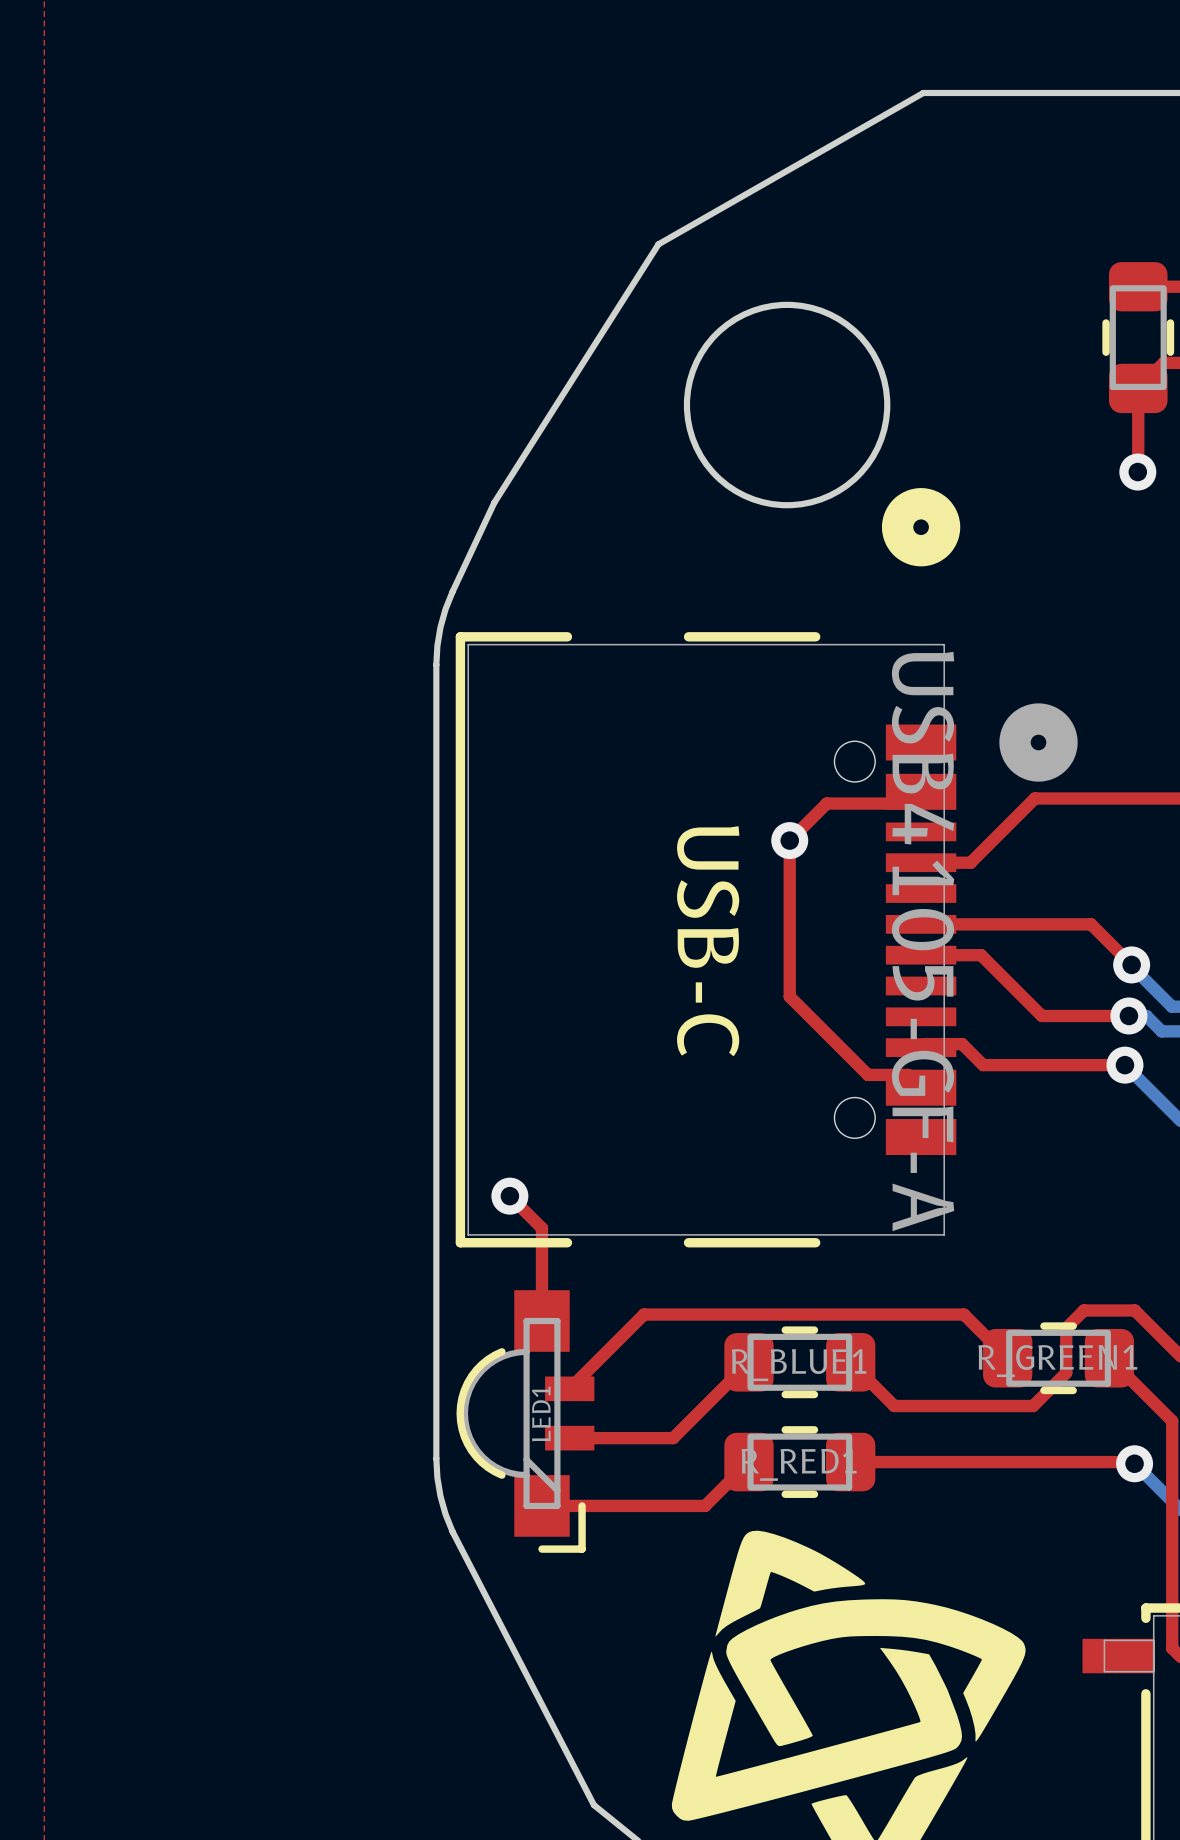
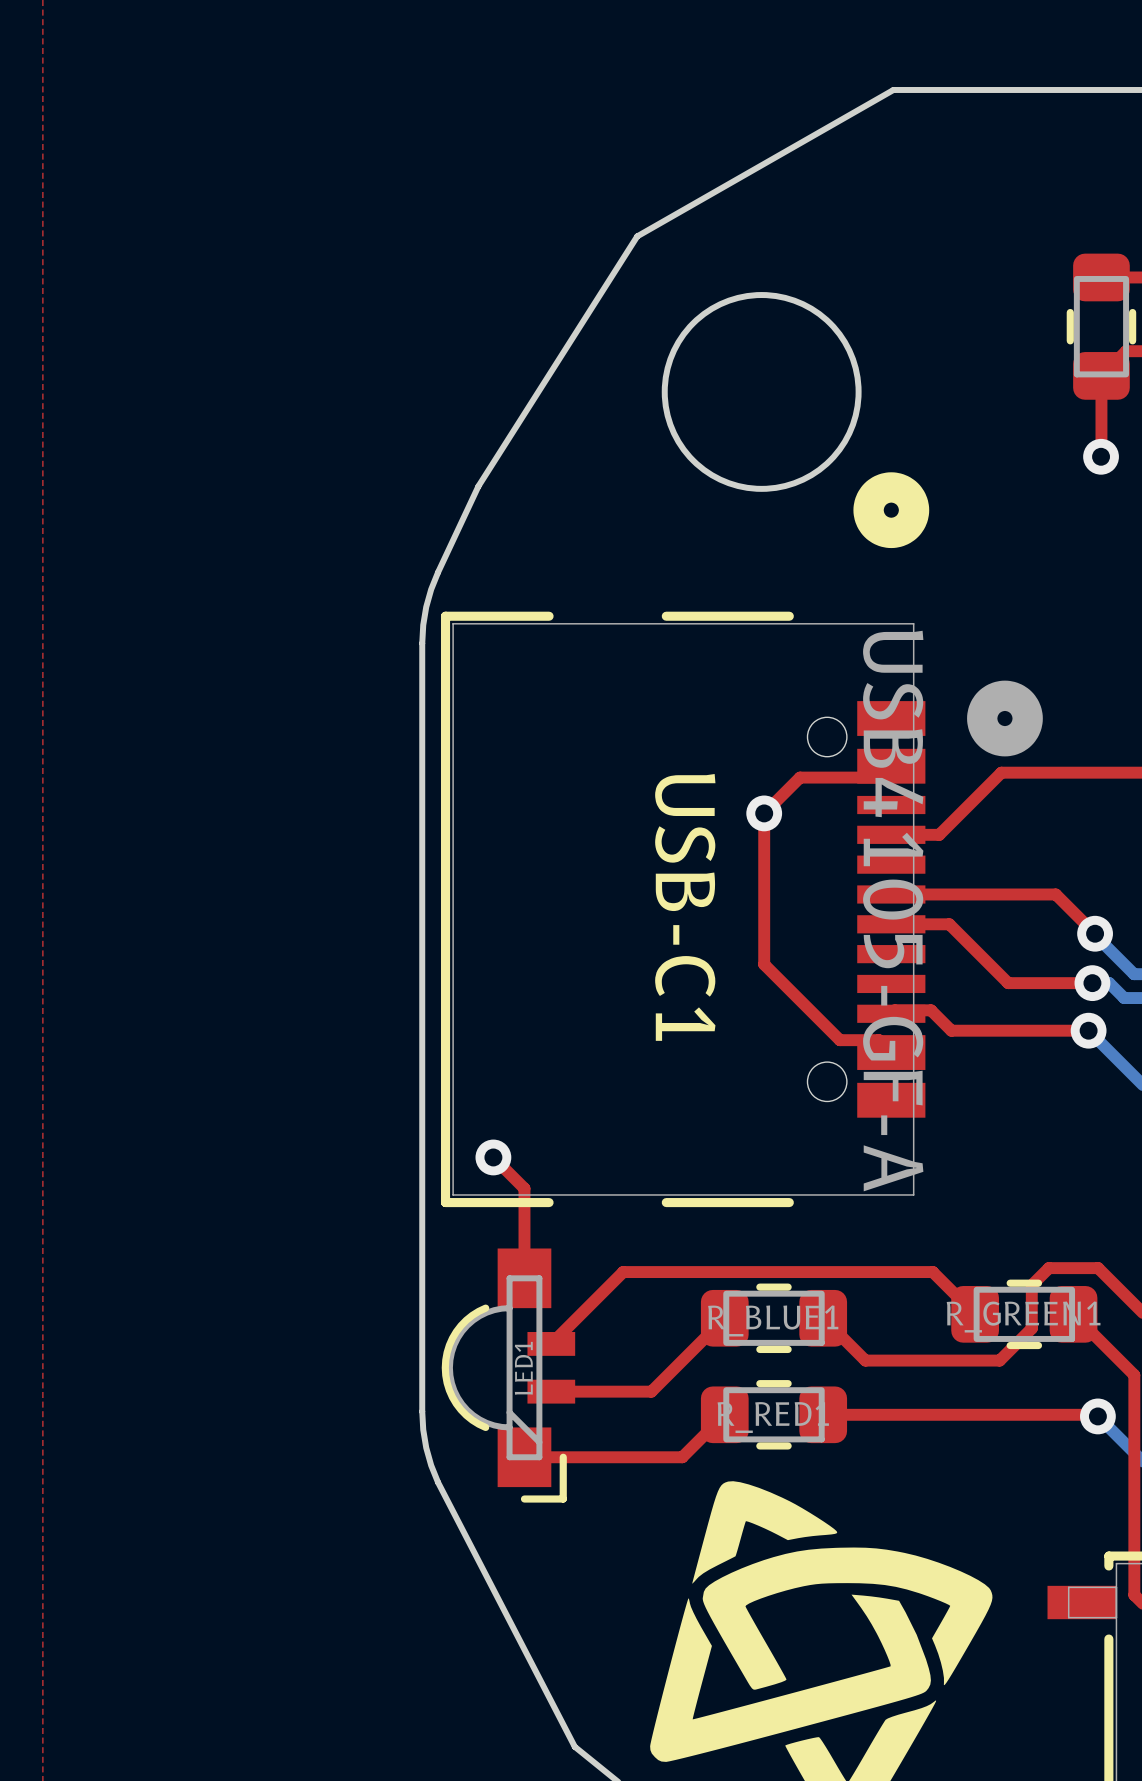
USB-C name: USB-C (708, 941) -> USB-C1 (685, 907)

